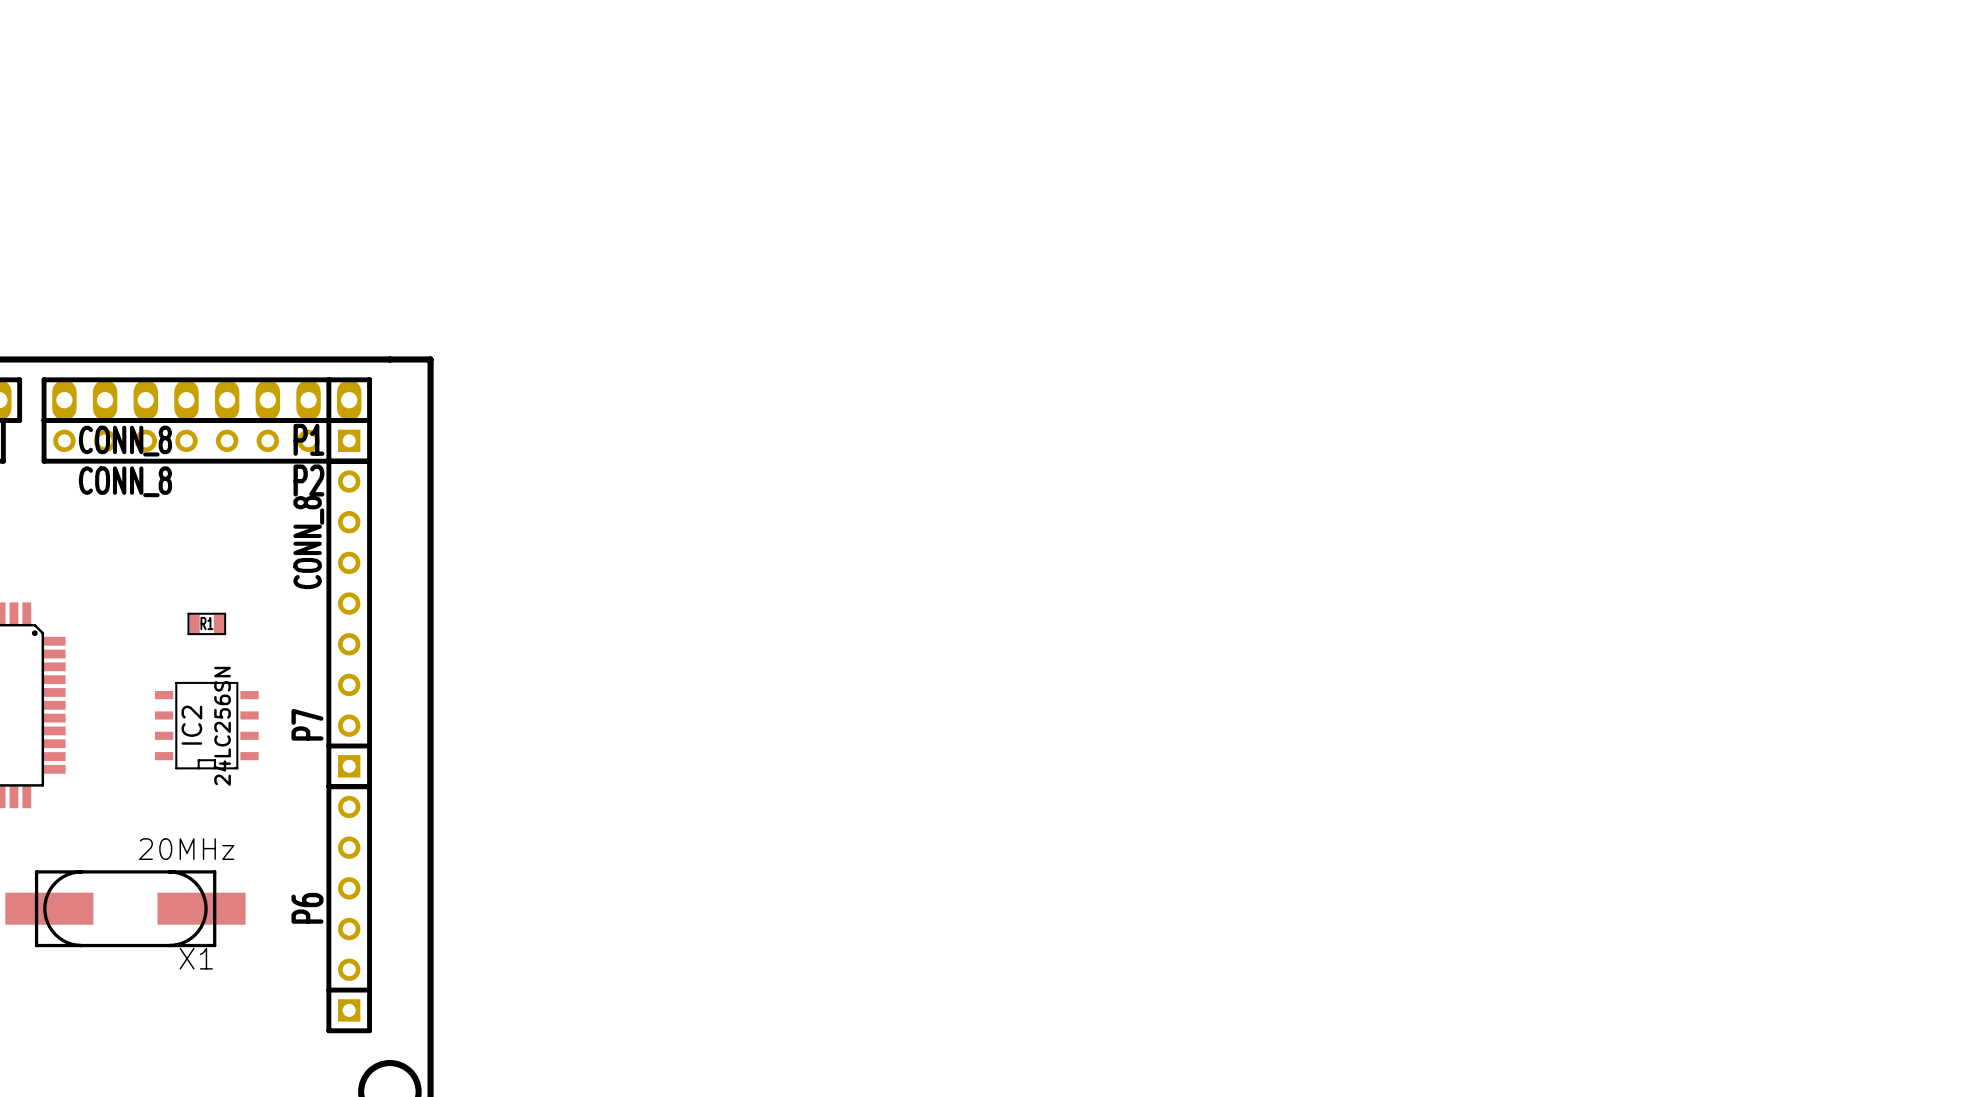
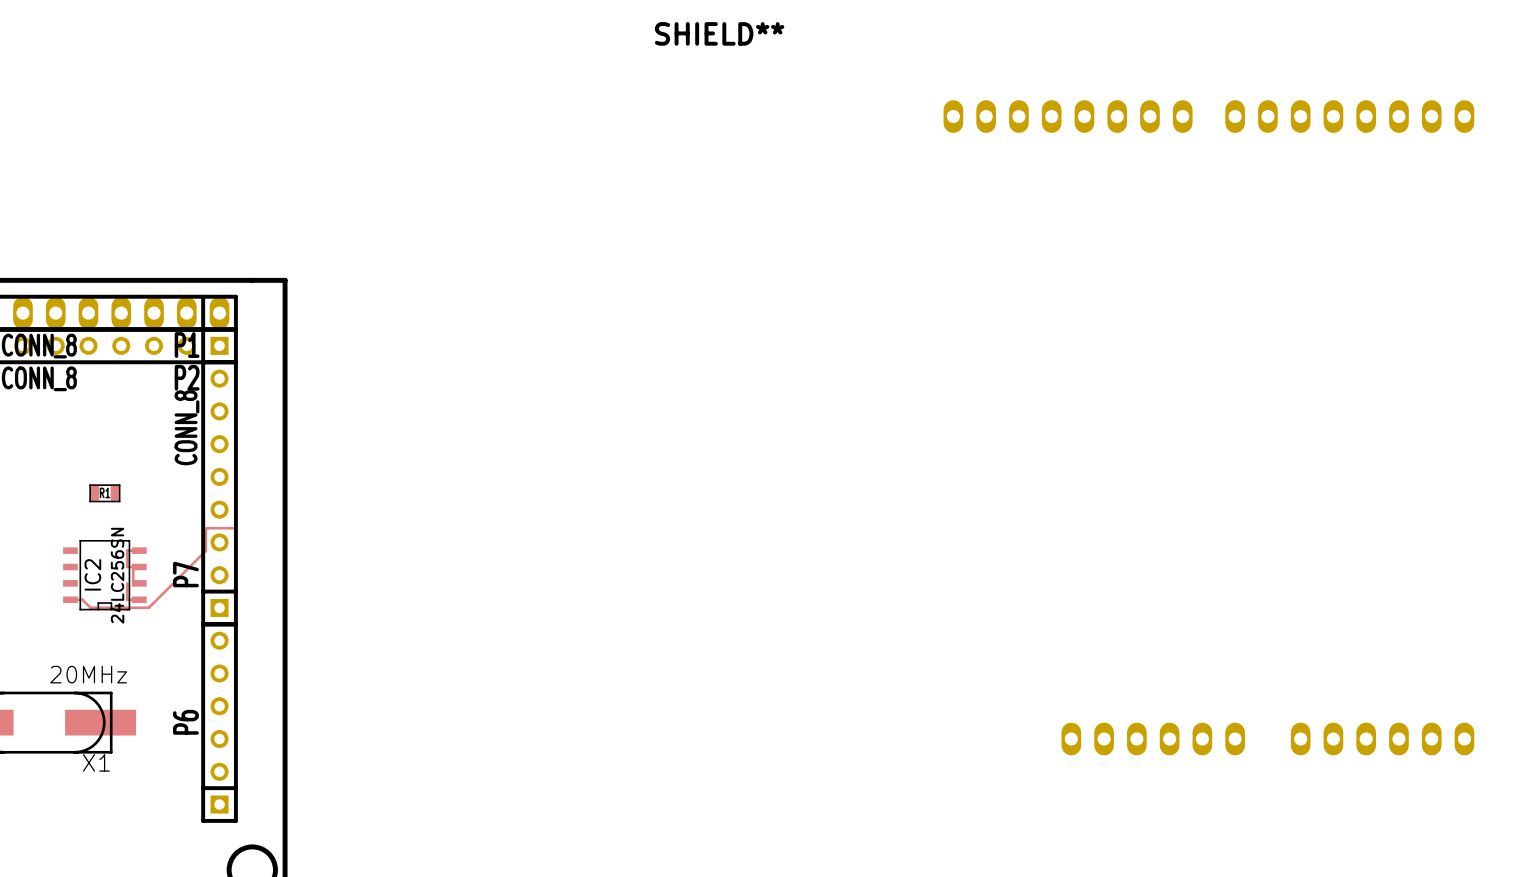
SHIELD**: none -> (1208, 427)
top track: none -> (233, 528) (206, 528) (205, 550) (148, 607) (90, 607) (82, 599) (70, 599)
top track: none -> (139, 550) (127, 550) (127, 567) (139, 567)
top track: none -> (133, 567) (133, 583)
top track: none -> (127, 583) (127, 599) (139, 599)

